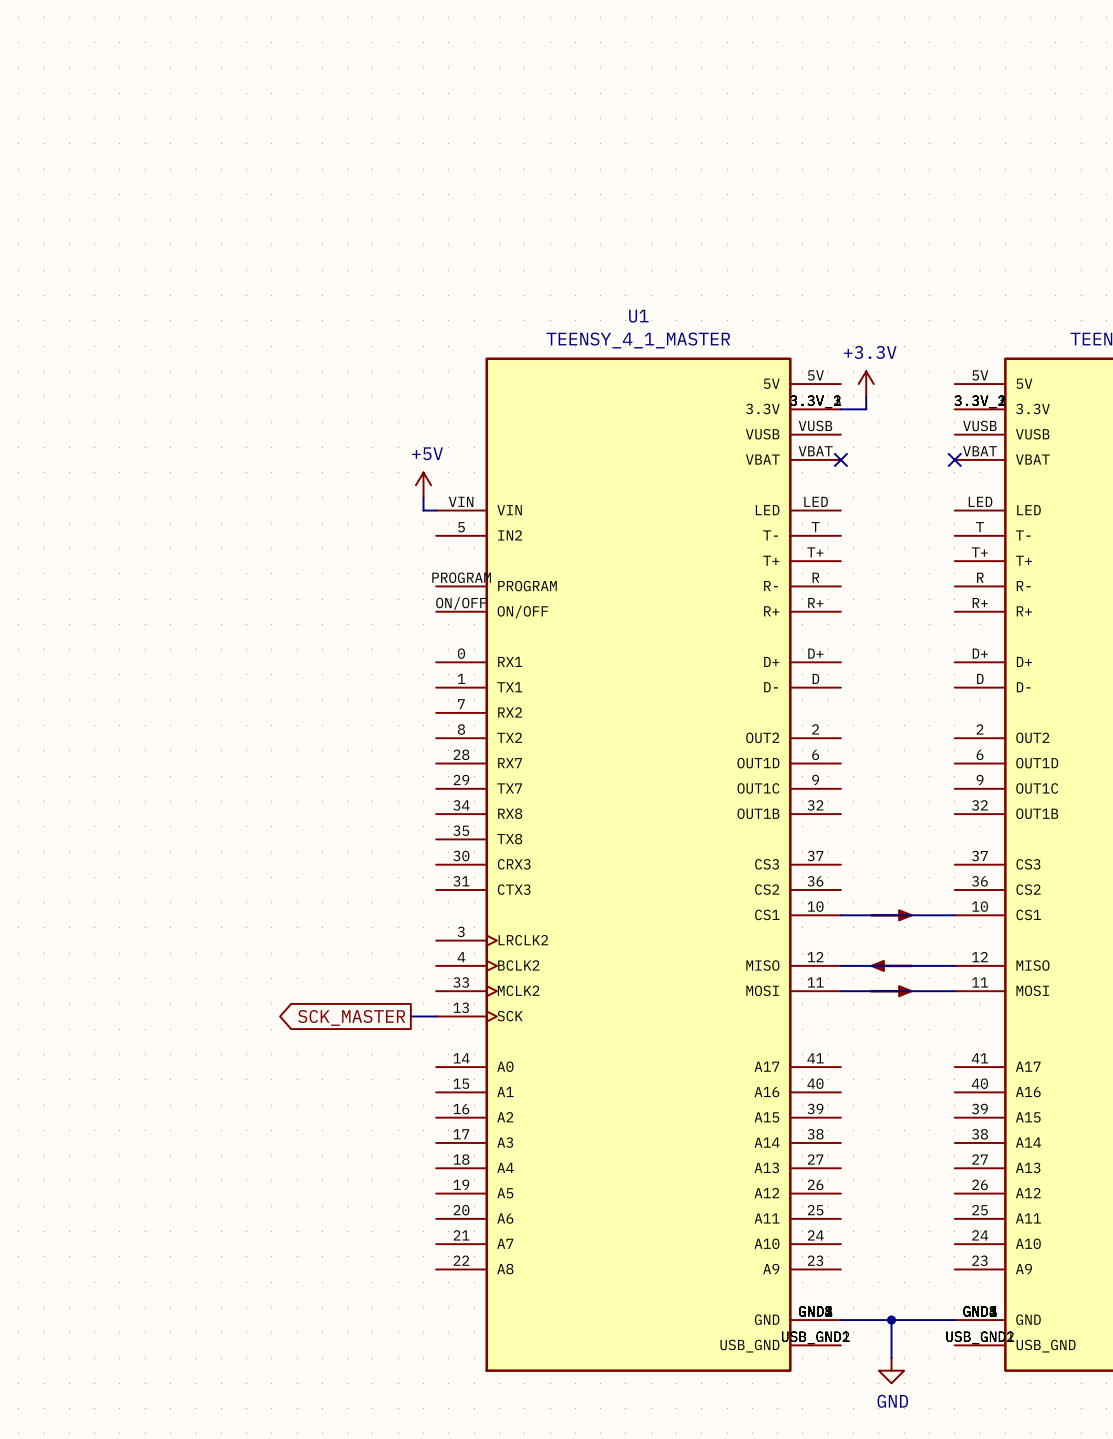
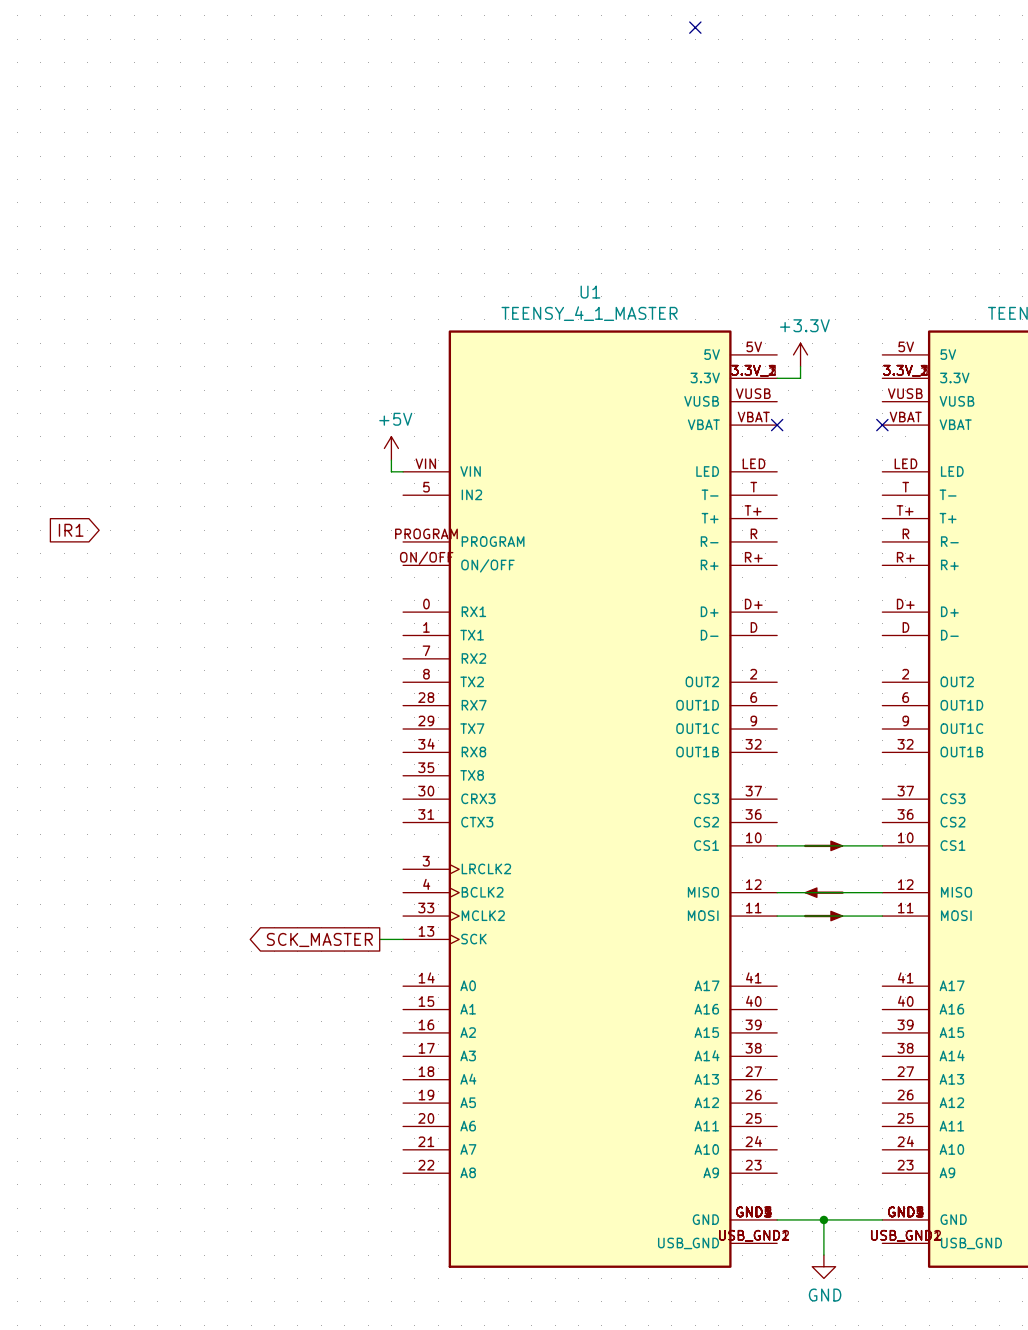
no-connect mark: none -> (695, 27)
global label: none -> IR1 (71, 530)

